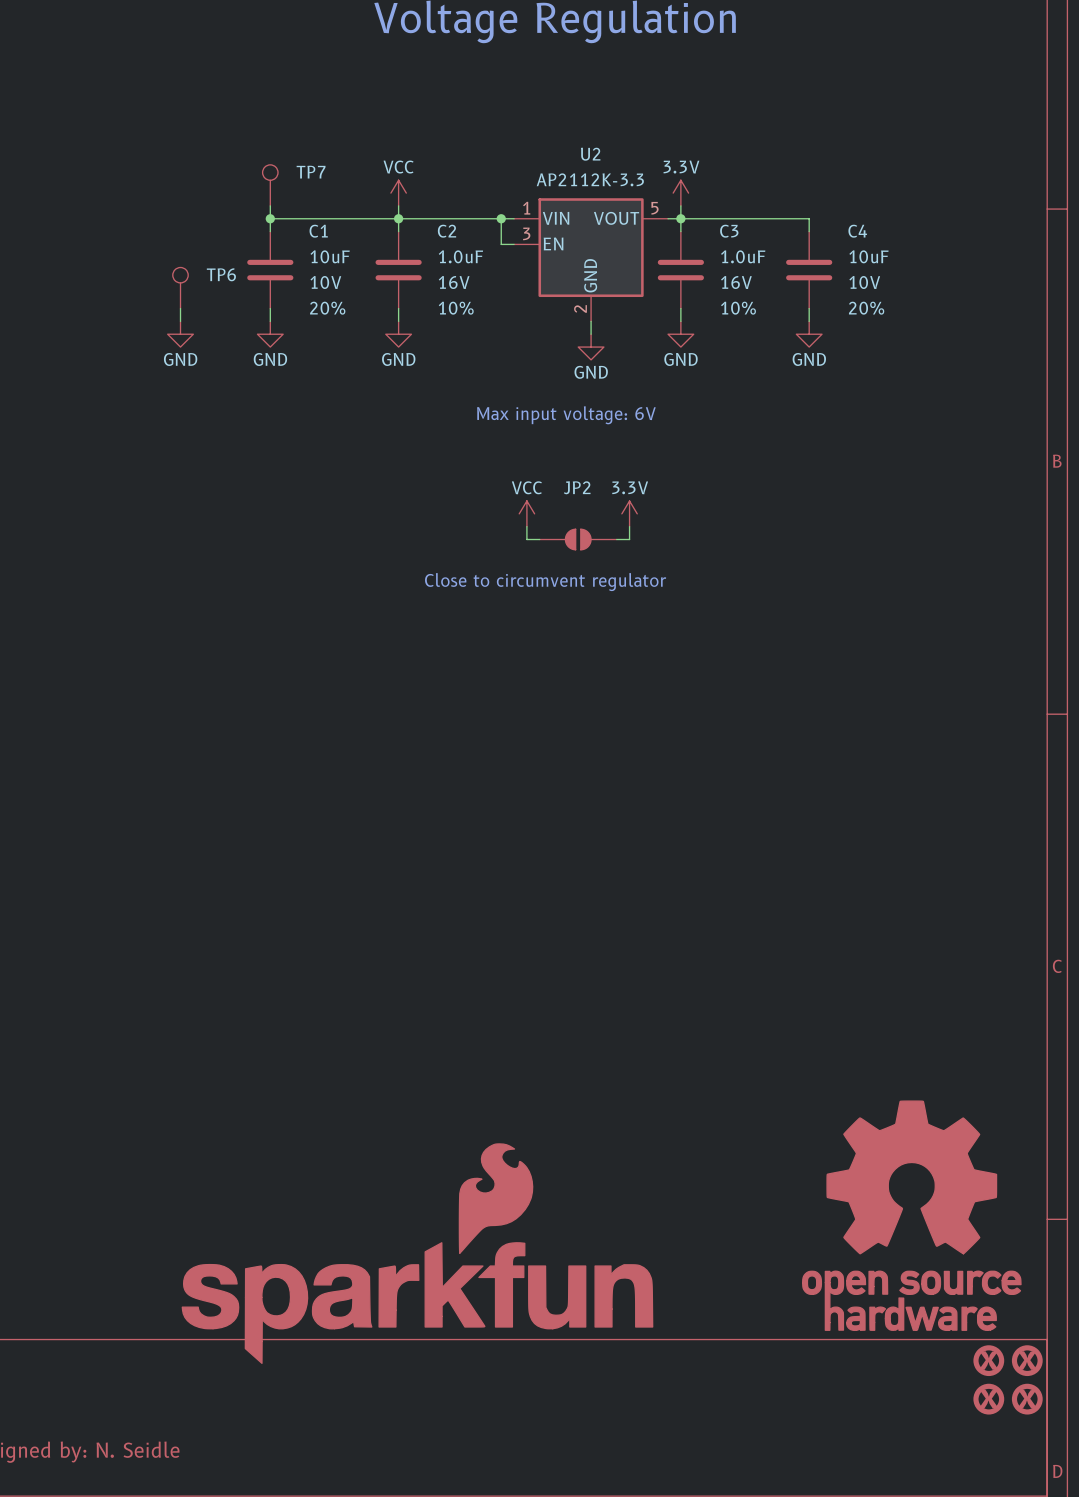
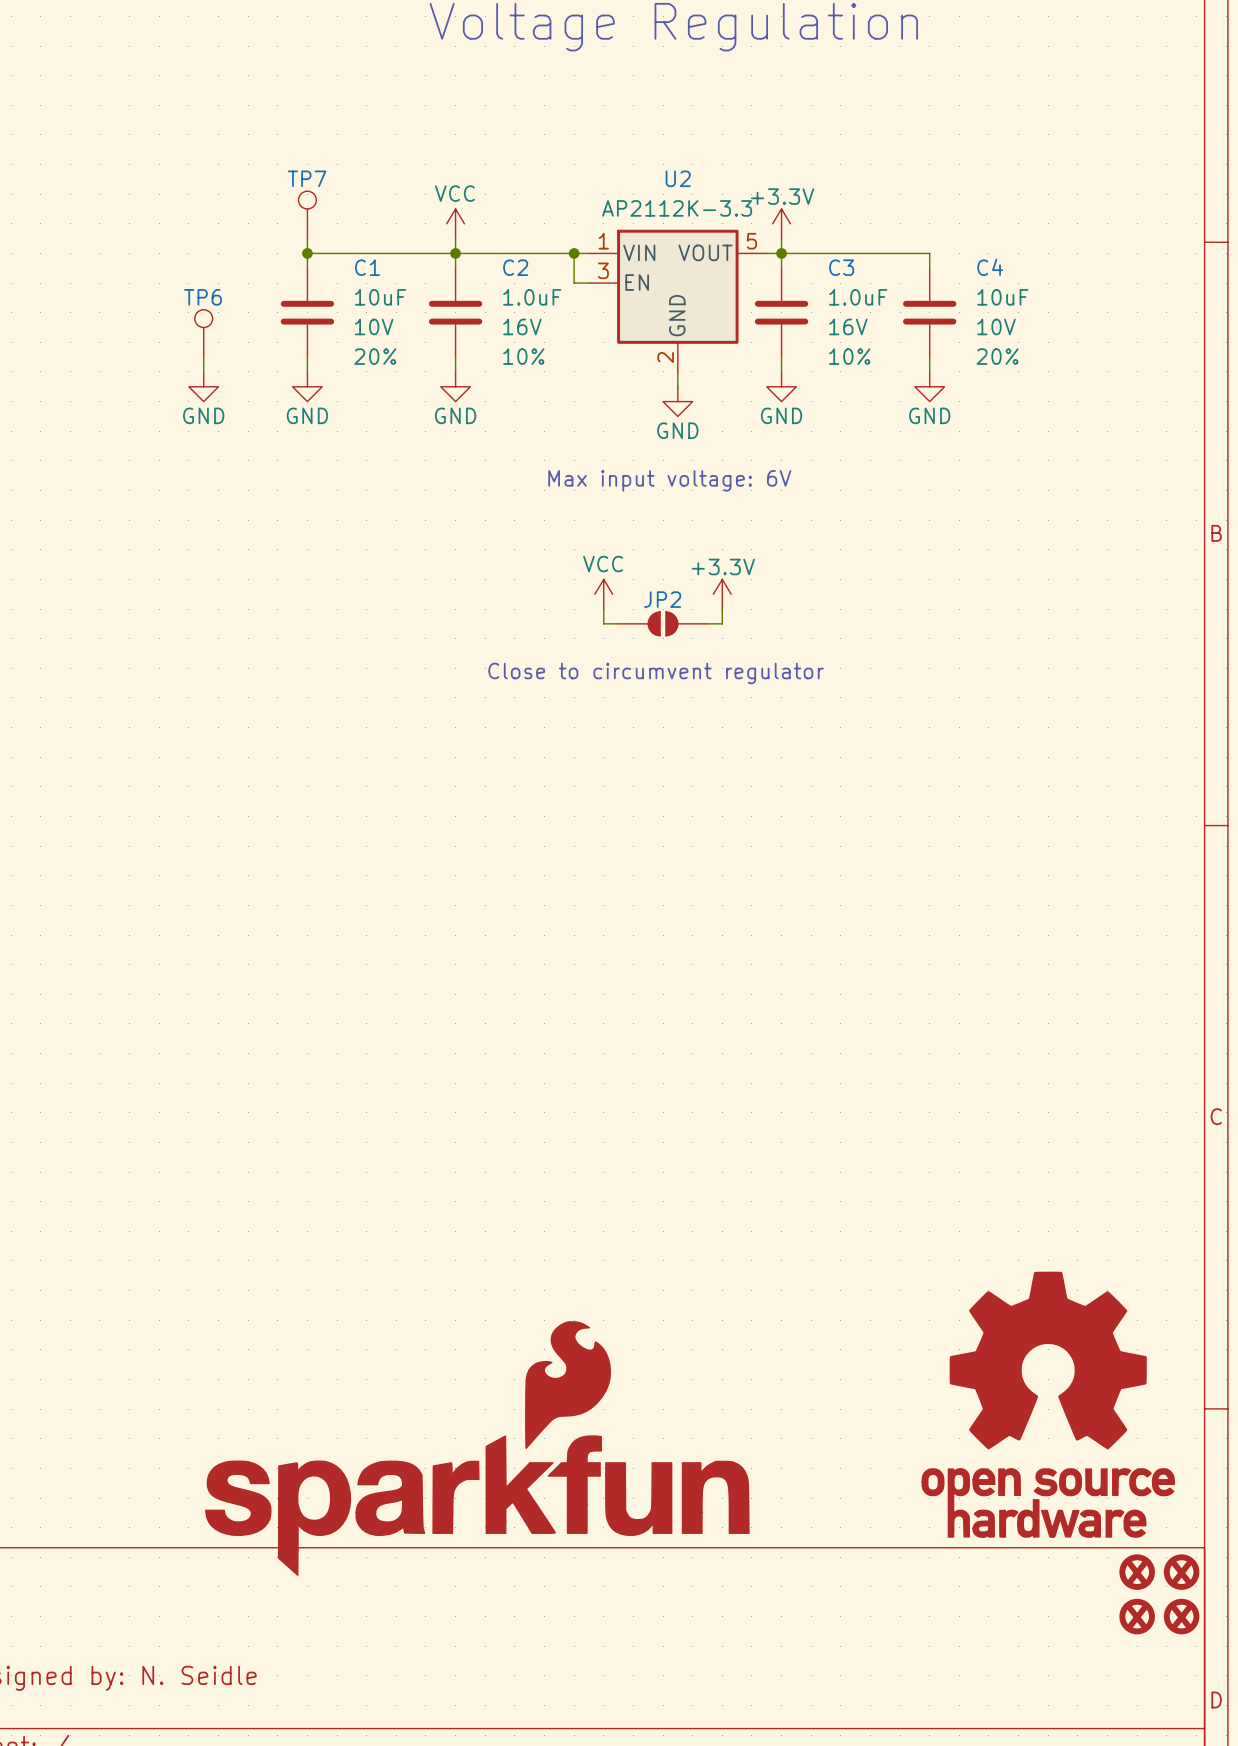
TP7 name position: TP7 (311, 172) -> TP7 (307, 178)
power symbol: 3.3V (680, 193) -> +3.3V (781, 223)
TP6 name position: TP6 (221, 274) -> TP6 (202, 297)
JP2 name position: JP2 (577, 487) -> JP2 (662, 599)
power symbol: 3.3V (629, 513) -> +3.3V (722, 594)

